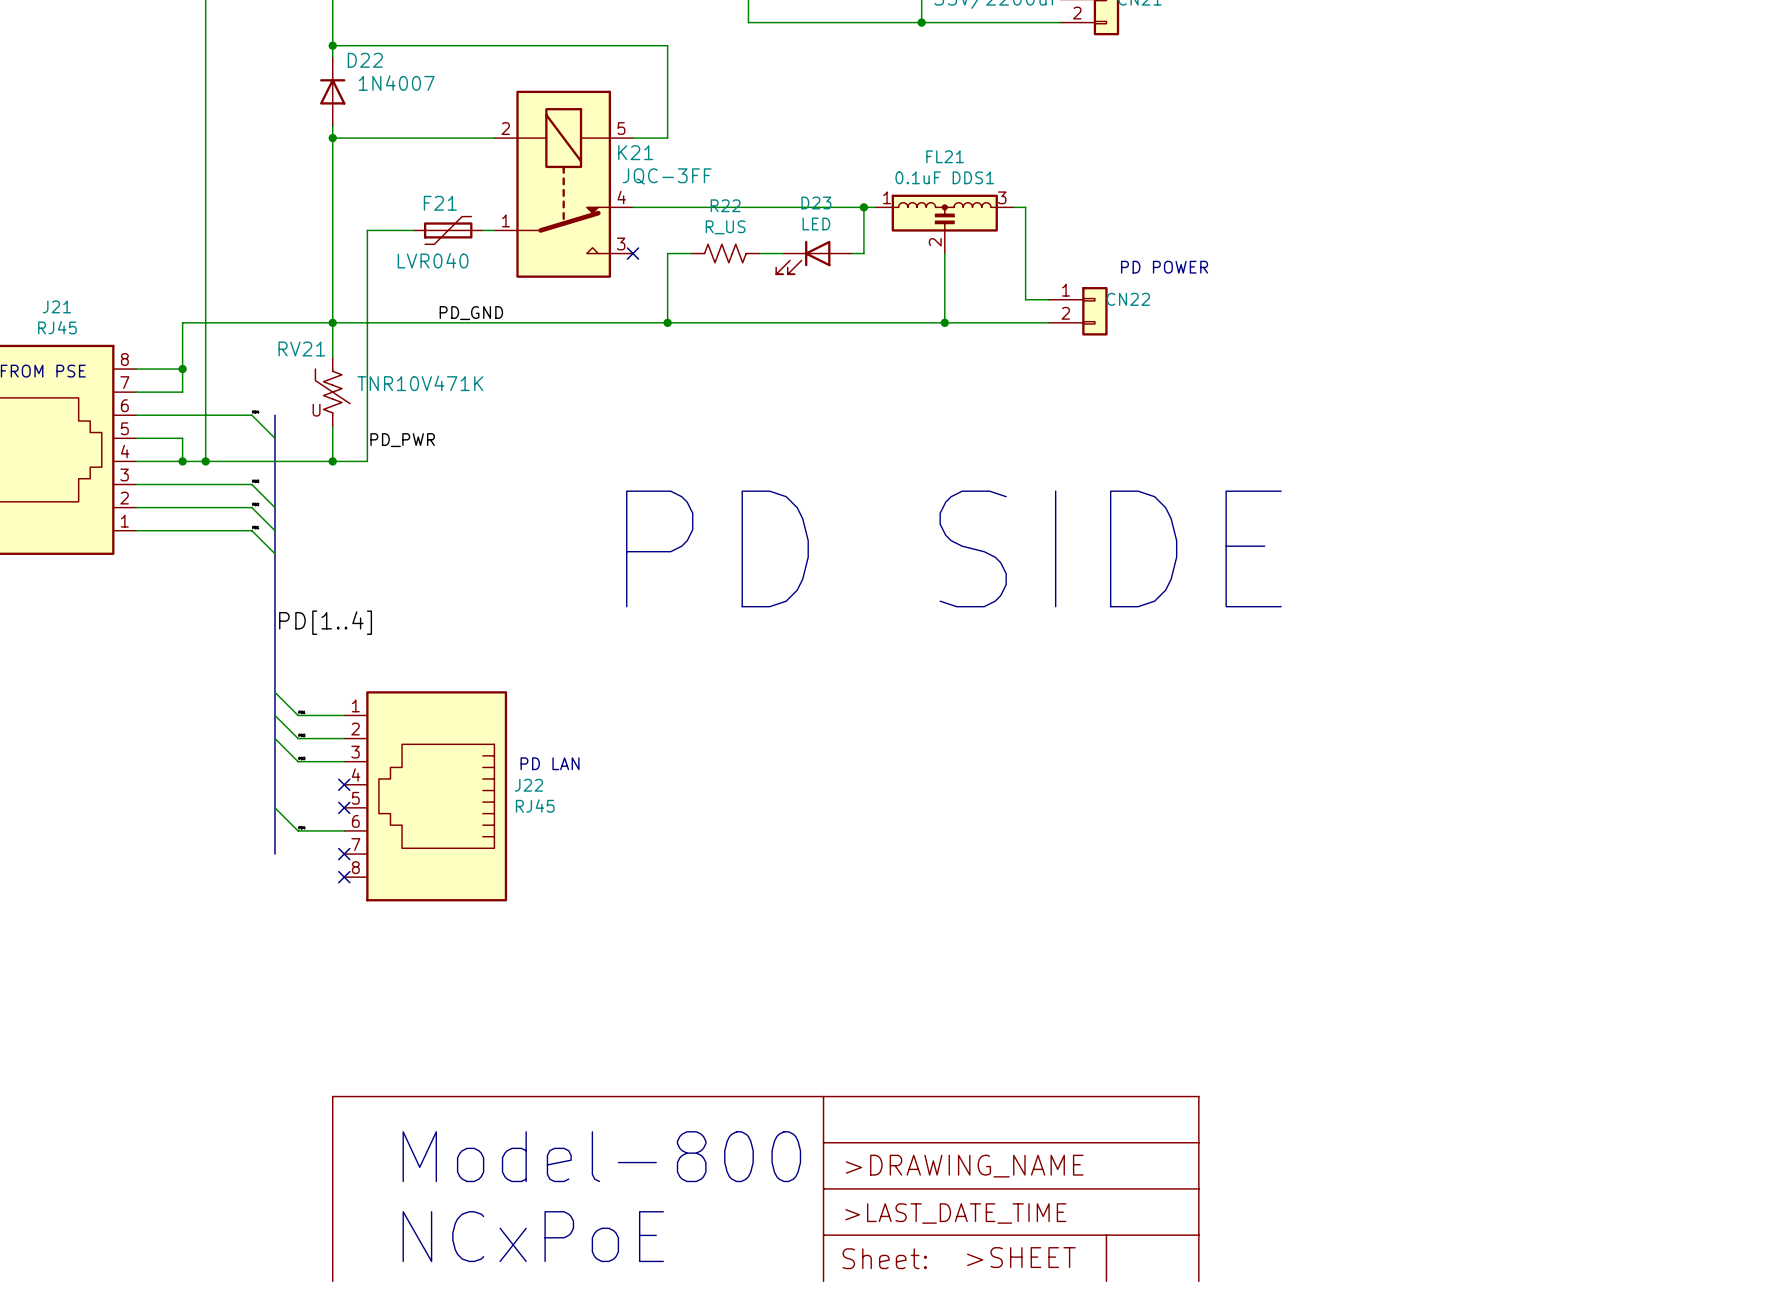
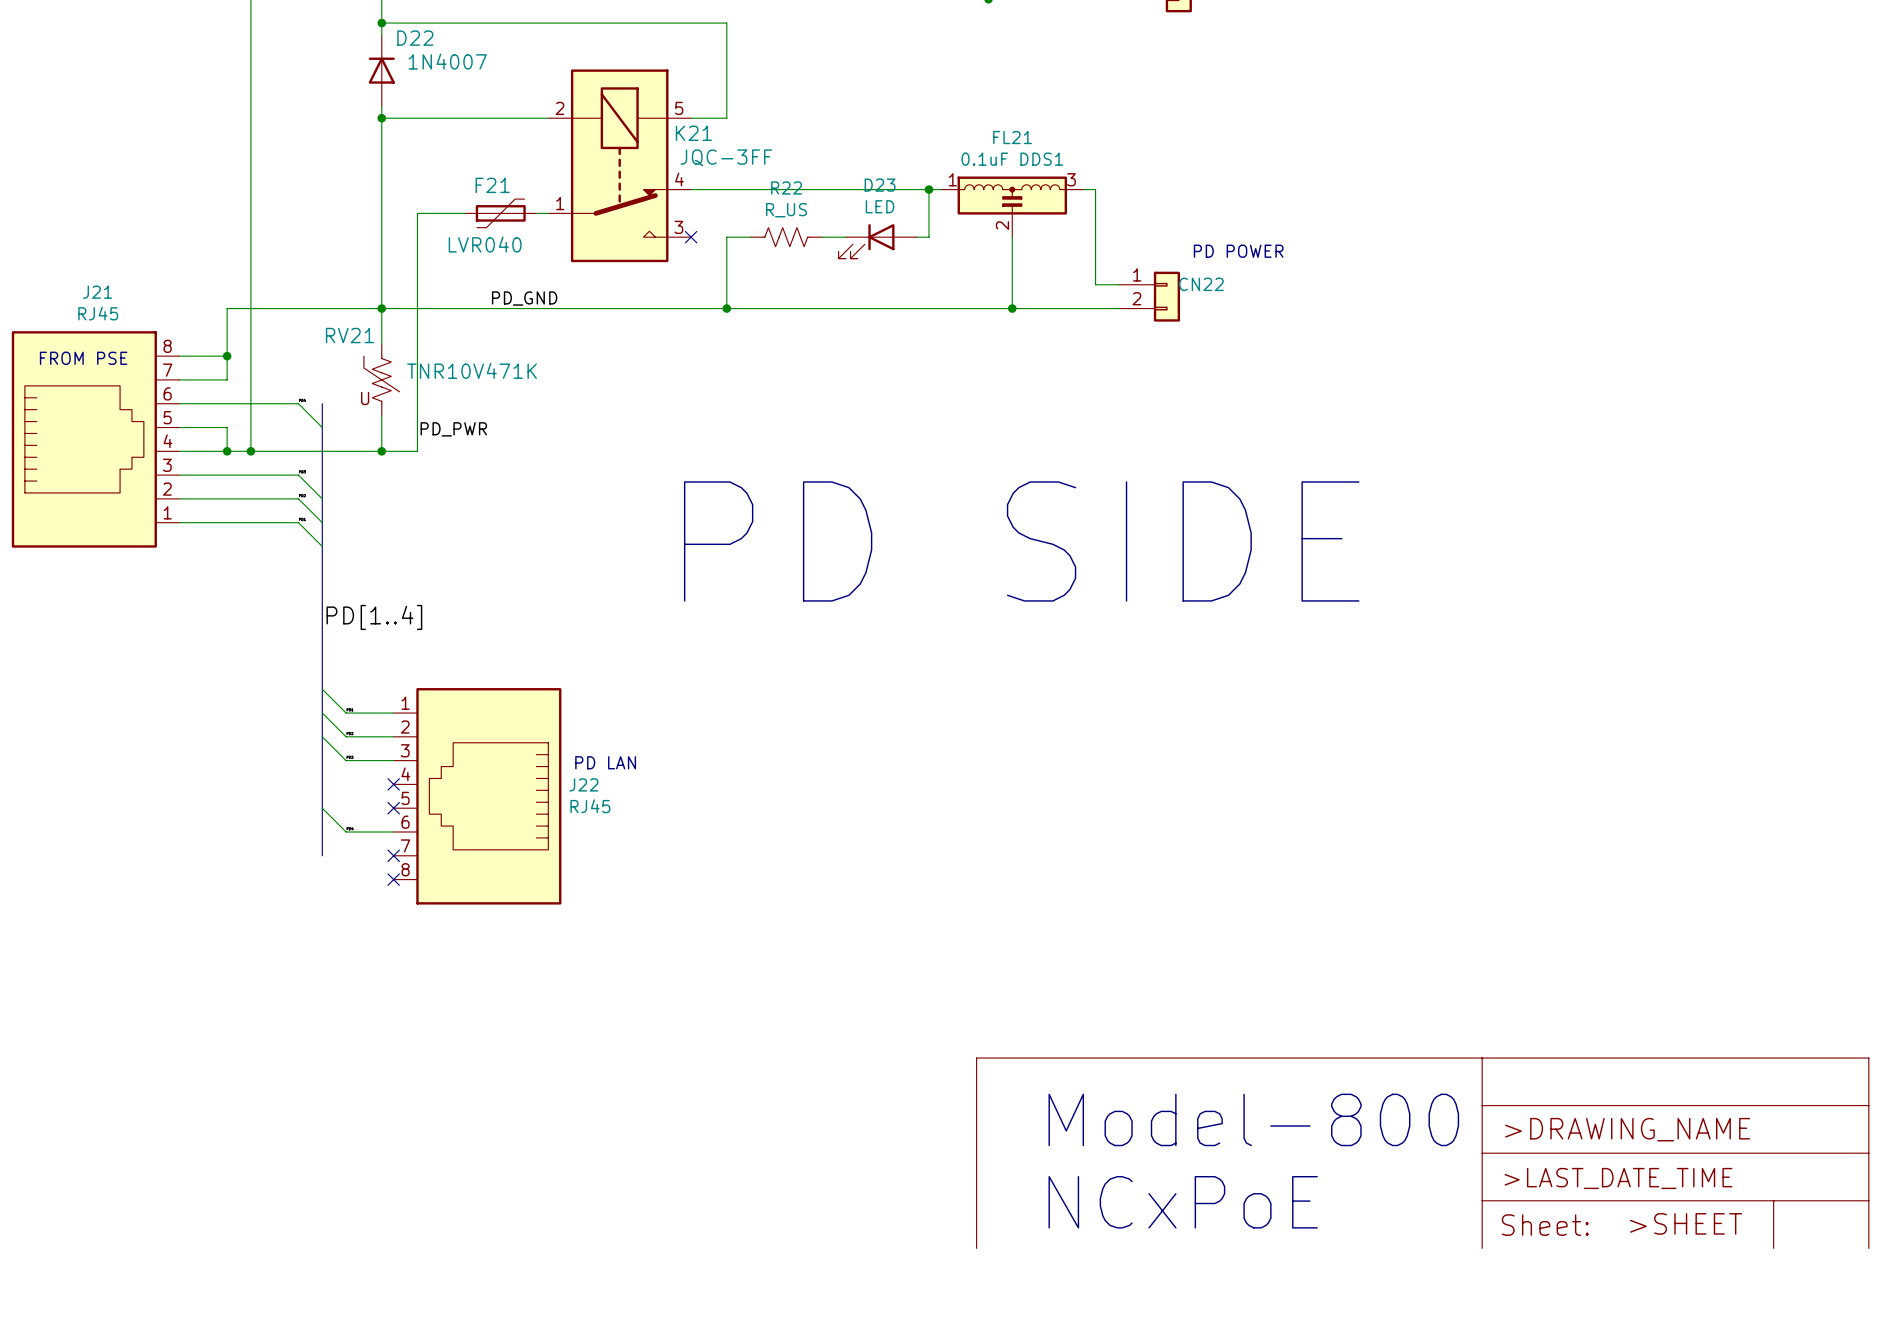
text: none -> Model-800 (1253, 1119)
power symbol: none -> (1422, 1153)
text: Model-800 (601, 1156) -> none
power symbol: (765, 1188) -> none
text: none -> NCxPoE (1183, 1202)
text: NCxPoE (533, 1236) -> none

